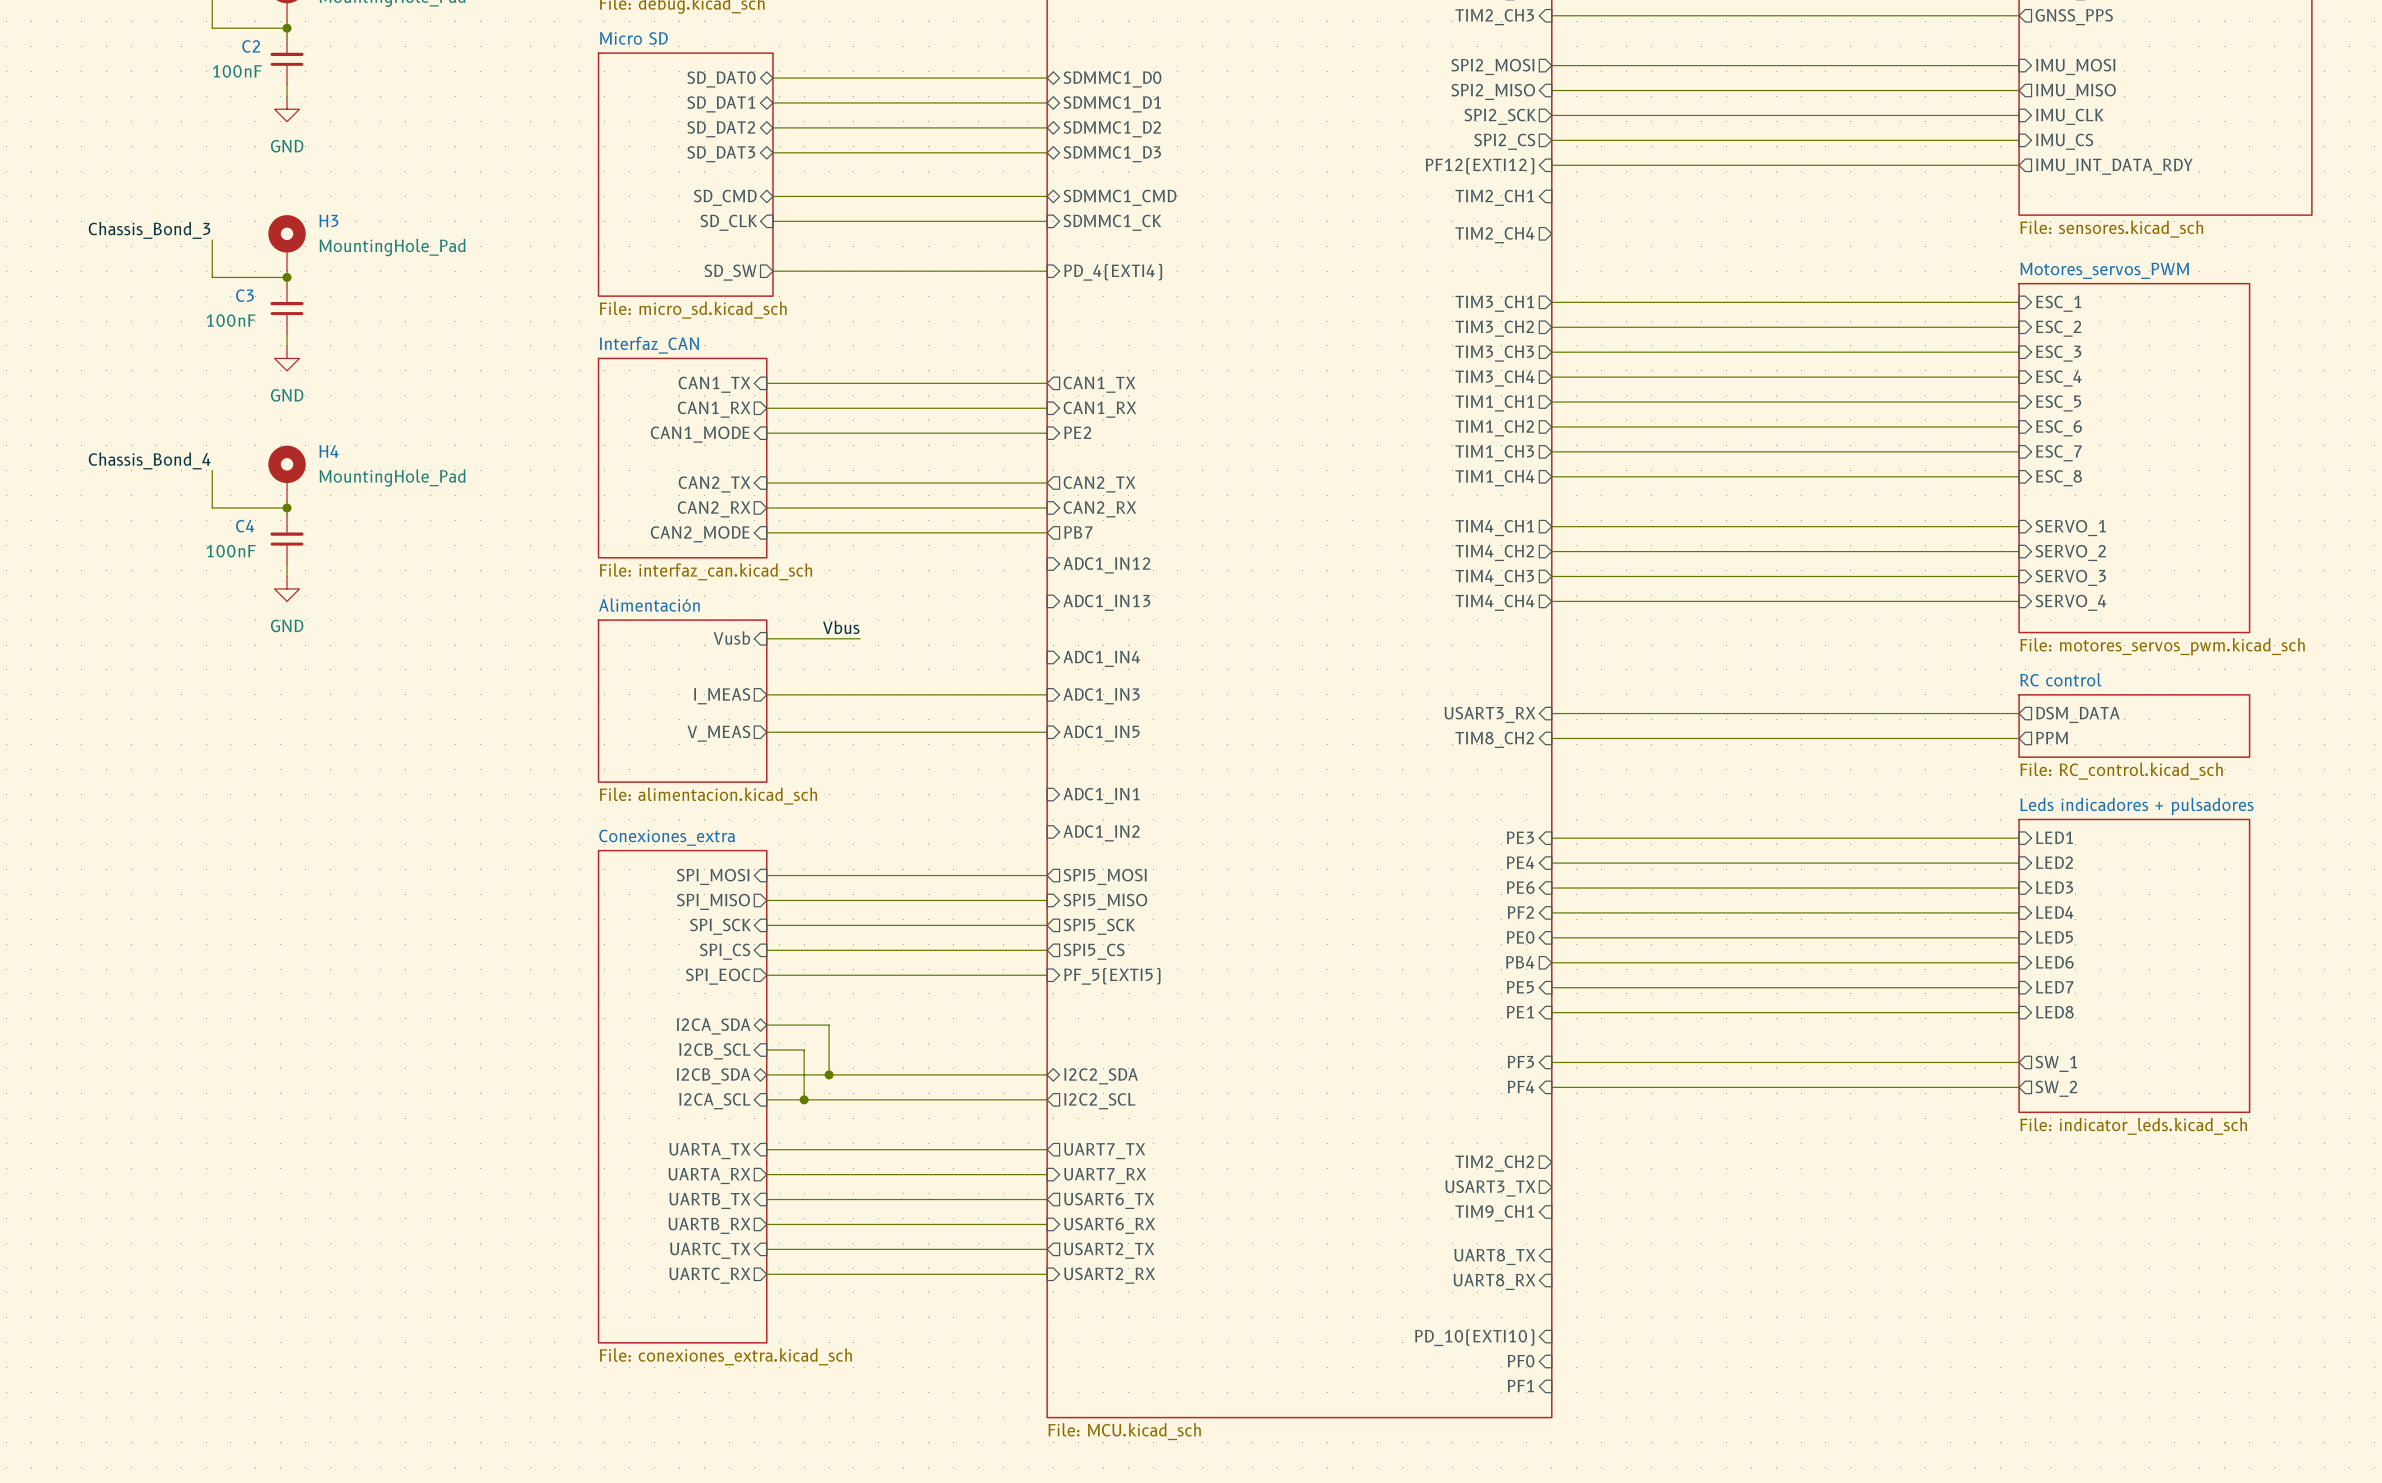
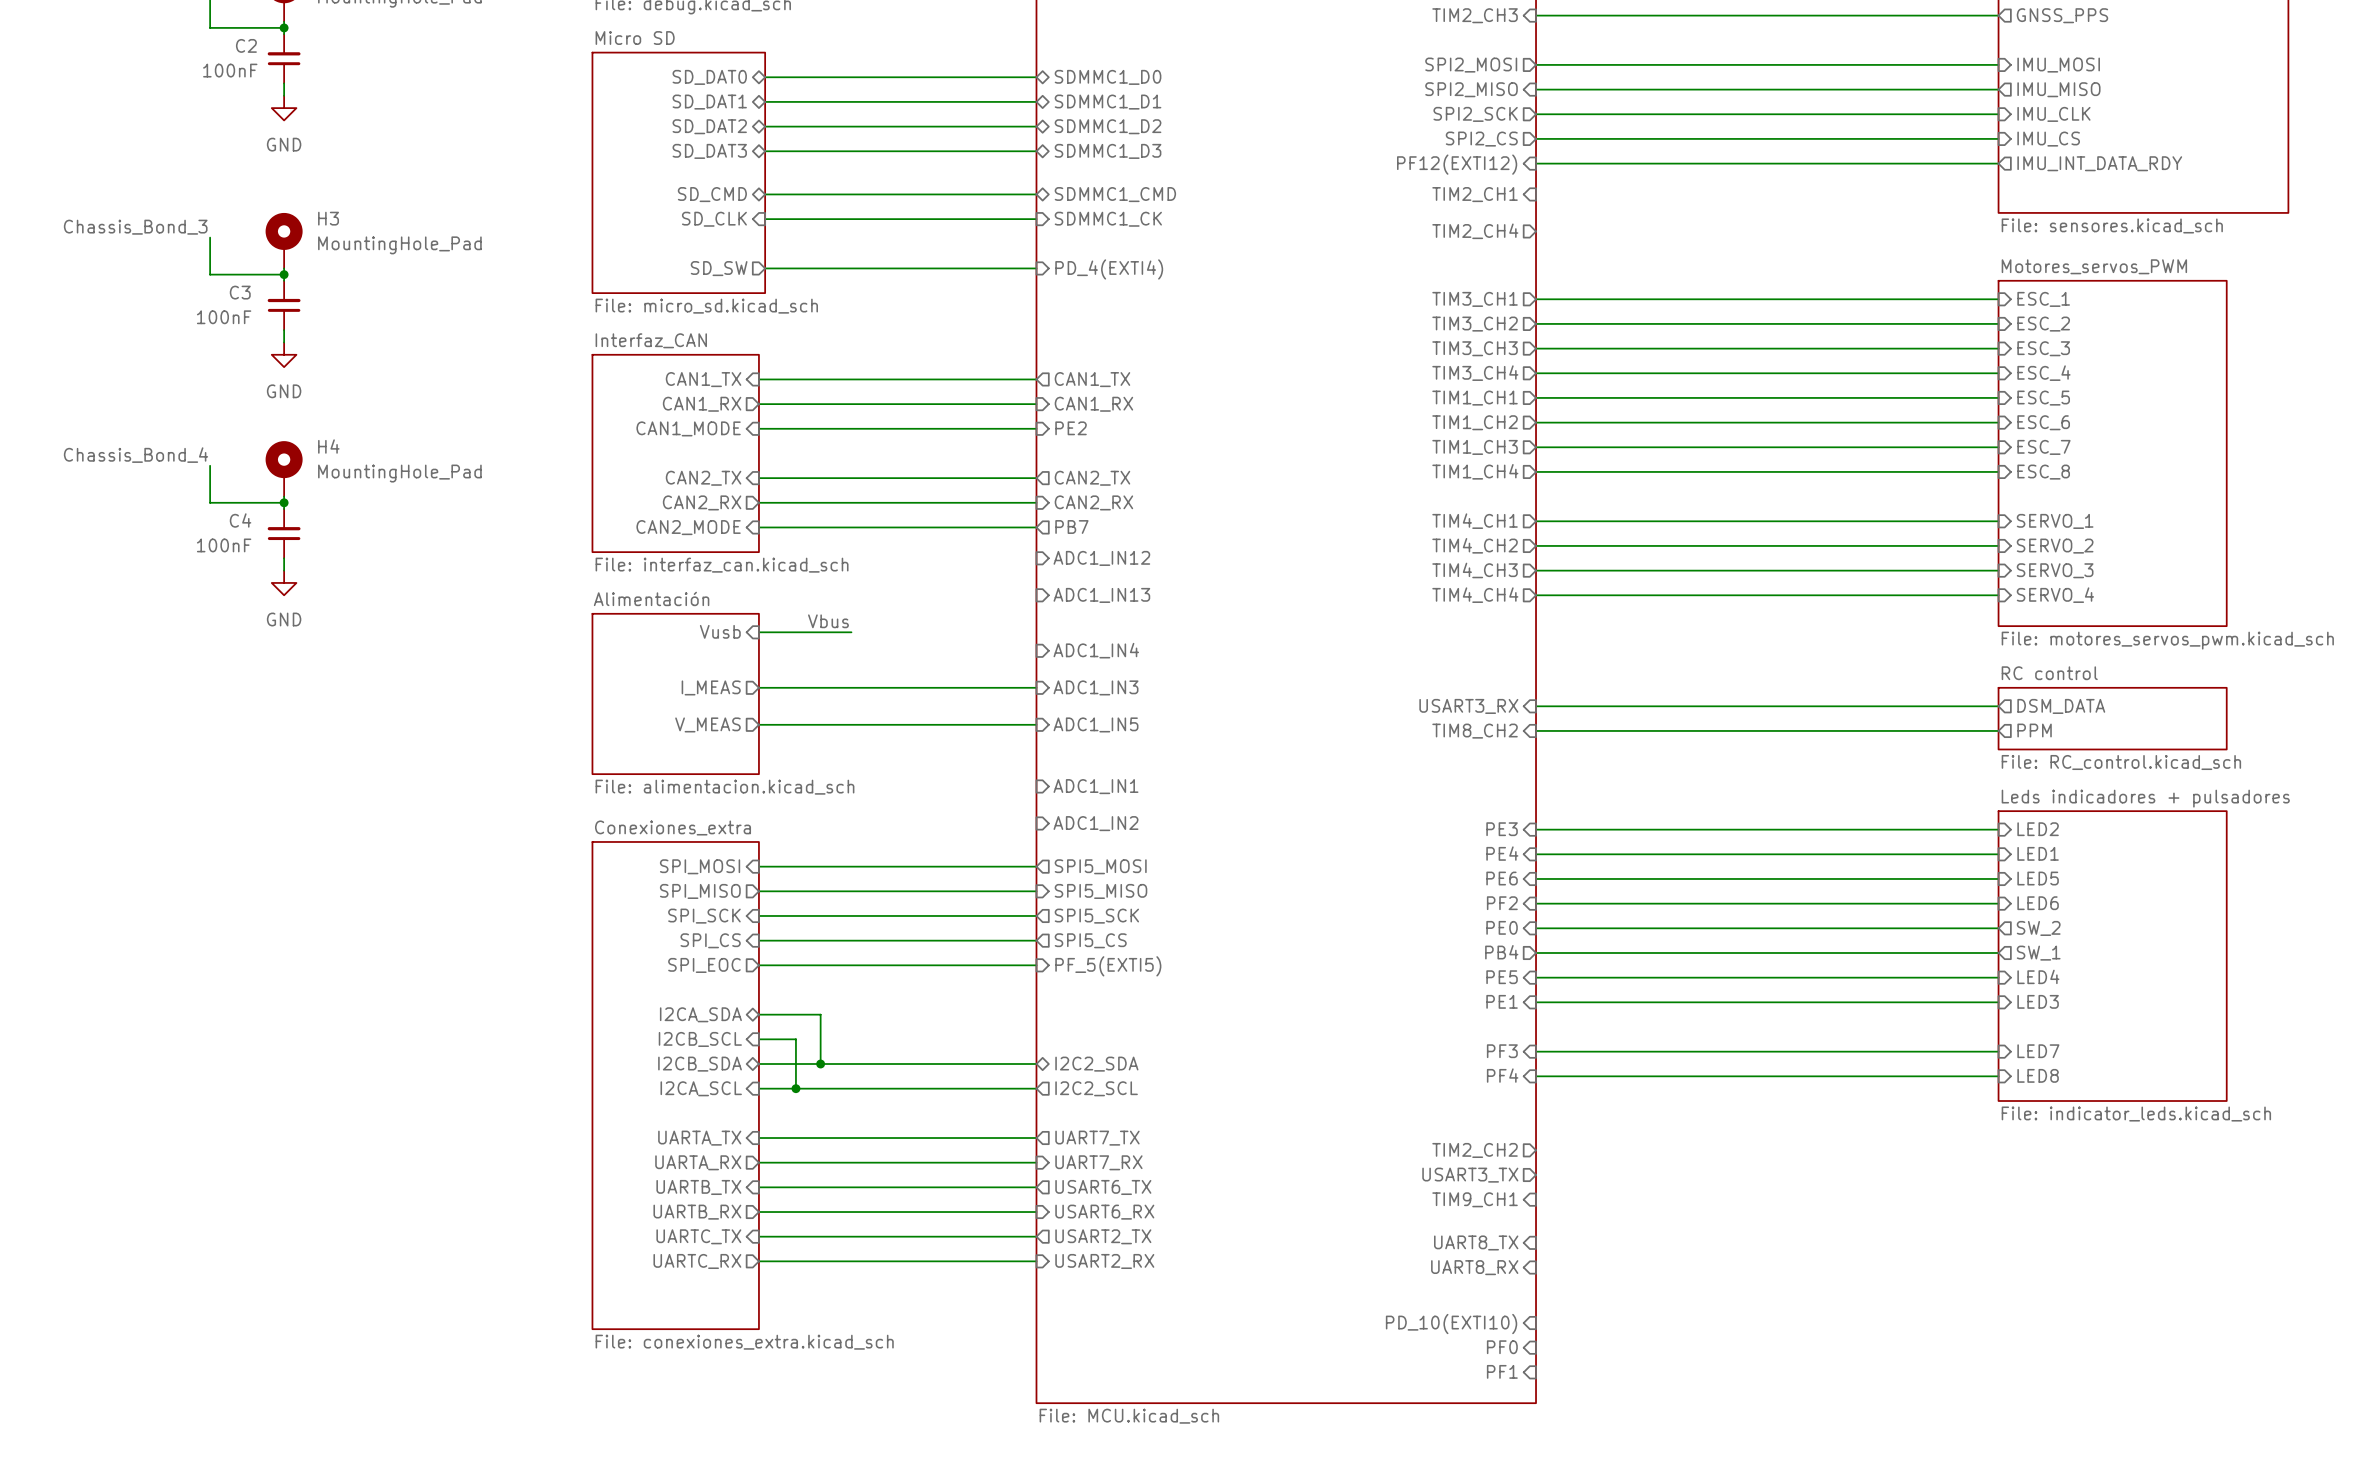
sheet pin: LED1 (2054, 837) -> LED2 (2038, 829)
sheet pin: LED2 (2054, 862) -> LED1 (2038, 853)
sheet pin: LED3 (2054, 887) -> LED5 (2038, 878)
sheet pin: LED4 (2054, 912) -> LED6 (2038, 903)
sheet pin shape: input (2054, 937) -> output (2038, 928)
sheet pin: LED5 (2054, 937) -> SW_2 (2038, 928)
sheet pin shape: input (2054, 962) -> output (2038, 953)
sheet pin: LED6 (2054, 962) -> SW_1 (2038, 953)
sheet pin: LED7 (2054, 987) -> LED4 (2038, 976)
sheet pin: LED8 (2054, 1012) -> LED3 (2038, 1001)
sheet pin shape: output (2056, 1063) -> input (2038, 1051)
sheet pin: SW_1 (2056, 1063) -> LED7 (2038, 1051)
sheet pin shape: output (2056, 1088) -> input (2038, 1075)
sheet pin: SW_2 (2056, 1088) -> LED8 (2038, 1075)

